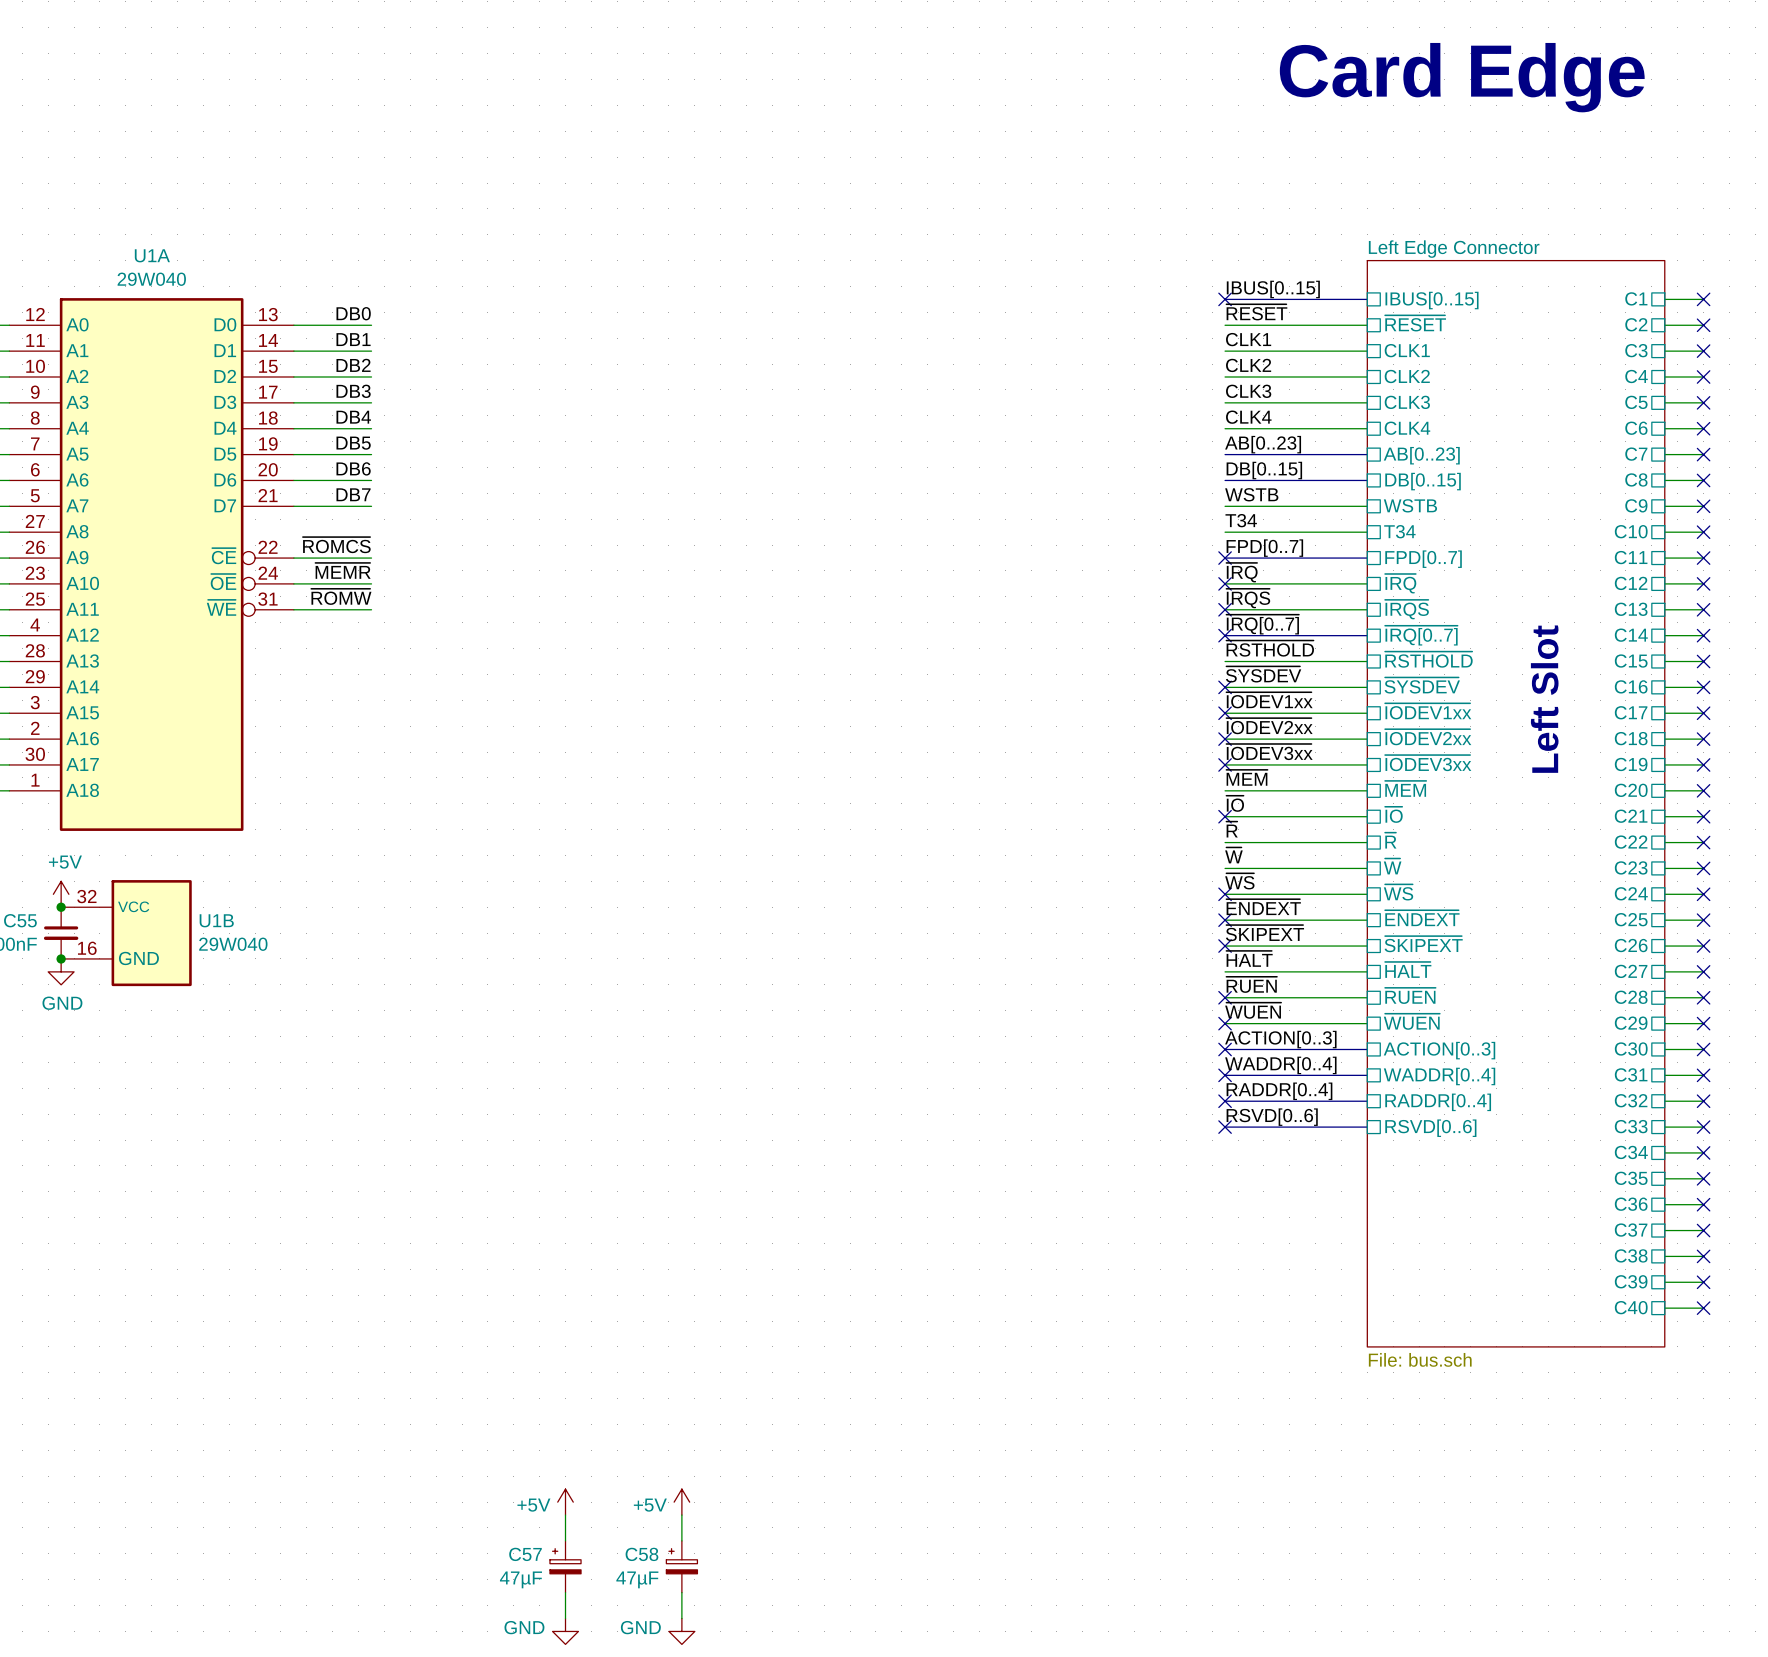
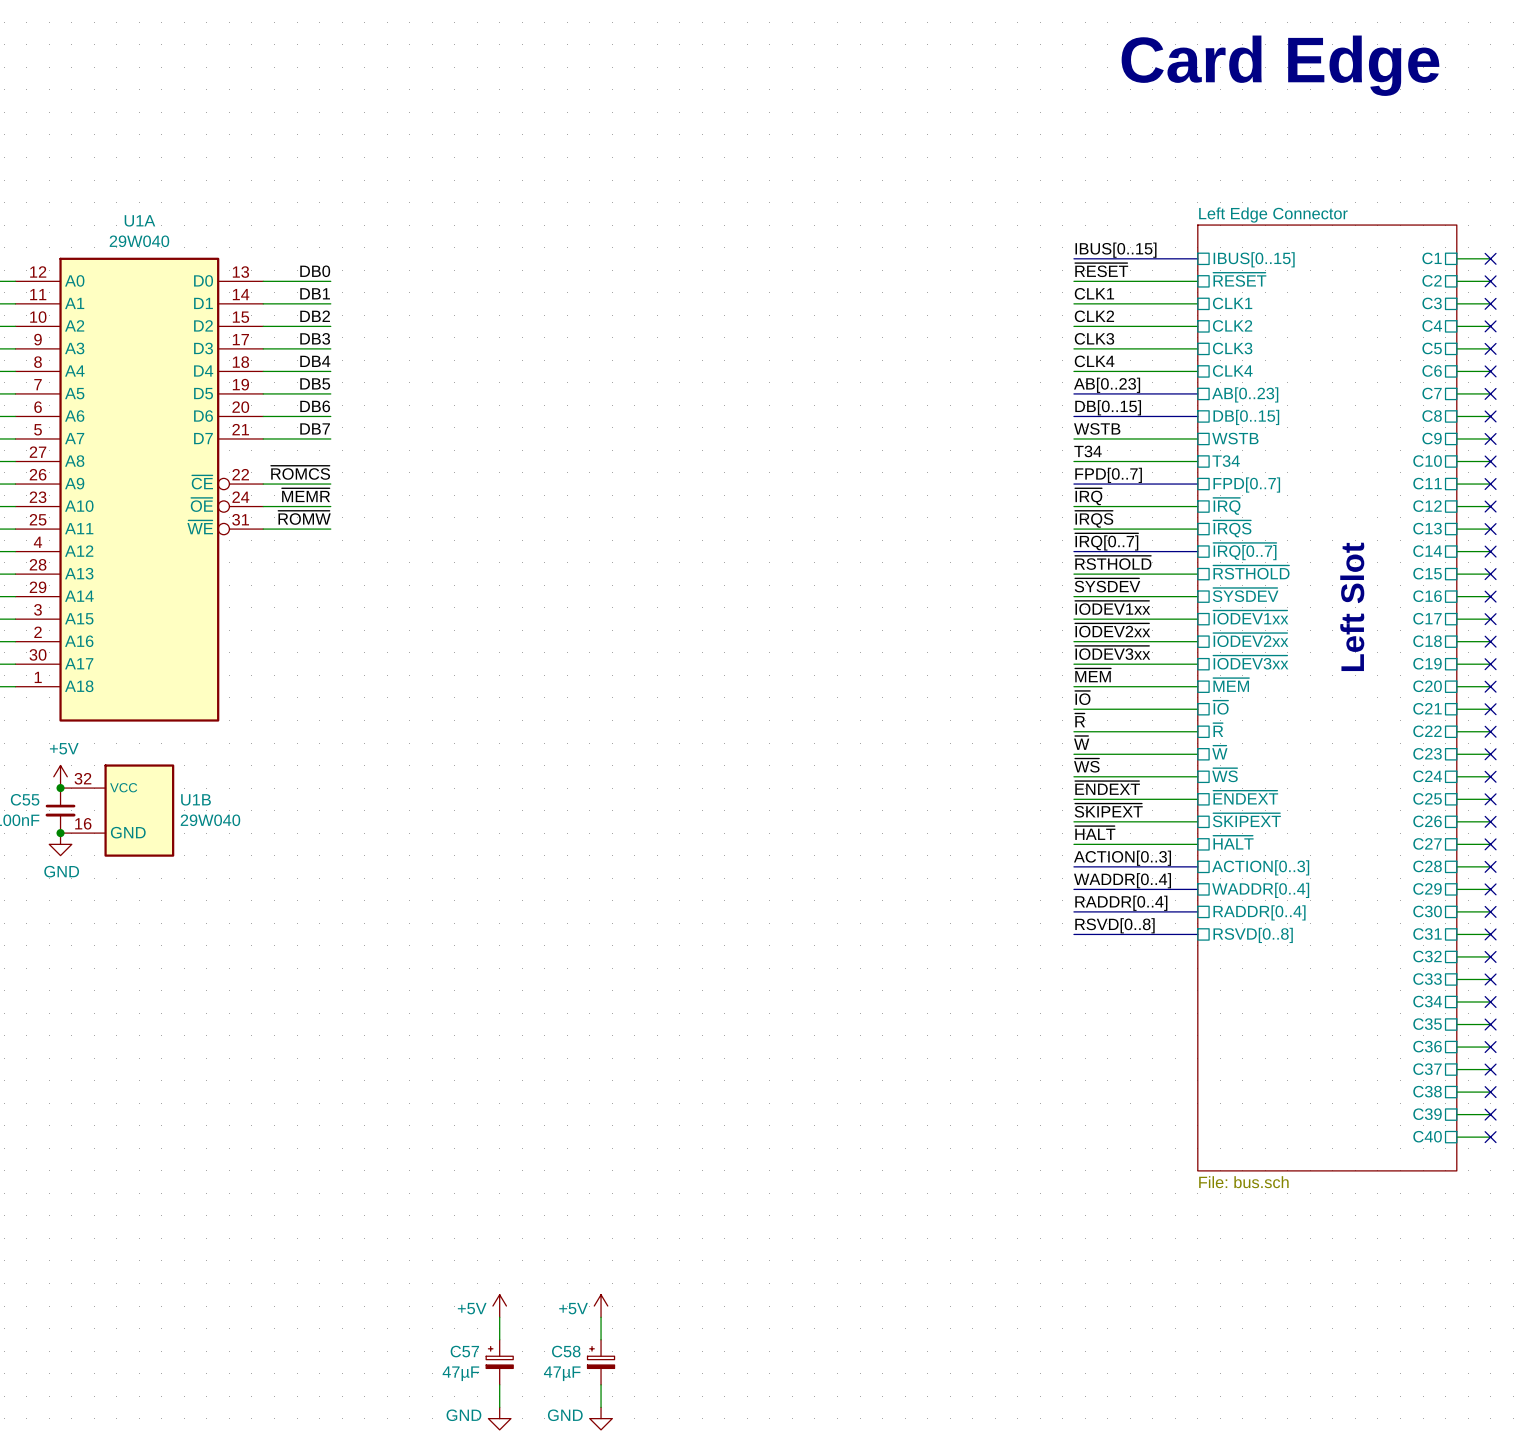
no-connect mark: (1225, 299) -> none
no-connect mark: (1225, 558) -> none
no-connect mark: (1225, 583) -> none
no-connect mark: (1225, 609) -> none
no-connect mark: (1225, 635) -> none
no-connect mark: (1225, 687) -> none
no-connect mark: (1225, 713) -> none
no-connect mark: (1225, 739) -> none
no-connect mark: (1225, 764) -> none
no-connect mark: (1225, 816) -> none
no-connect mark: (1225, 894) -> none
no-connect mark: (1225, 920) -> none
no-connect mark: (1225, 946) -> none
label: ~{RUEN} (1251, 984) -> ACTION[0..3] (1122, 858)
sheet pin: ~{RUEN} (1410, 995) -> ACTION[0..3] (1260, 867)
no-connect mark: (1225, 997) -> none
label: ~{WUEN} (1253, 1010) -> WADDR[0..4] (1122, 880)
sheet pin: ~{WUEN} (1411, 1021) -> WADDR[0..4] (1260, 890)
no-connect mark: (1225, 1023) -> none
label: ACTION[0..3] (1280, 1039) -> RADDR[0..4] (1121, 903)
no-connect mark: (1225, 1049) -> none
sheet pin: ACTION[0..3] (1439, 1050) -> RADDR[0..4] (1259, 912)
label: WADDR[0..4] (1280, 1065) -> RSVD[0..8] (1114, 925)
no-connect mark: (1225, 1075) -> none
sheet pin: WADDR[0..4] (1439, 1076) -> RSVD[0..8] (1253, 935)
label: RADDR[0..4] (1279, 1091) -> none
bus: (1225, 1101) (1367, 1101) -> (1073, 866) (1197, 866)
no-connect mark: (1225, 1101) -> none
sheet pin: RADDR[0..4] (1438, 1102) -> none
label: RSVD[0..6] (1272, 1117) -> none
bus: (1225, 1127) (1367, 1127) -> (1073, 889) (1197, 889)
no-connect mark: (1225, 1127) -> none
sheet pin: RSVD[0..6] (1430, 1128) -> none

